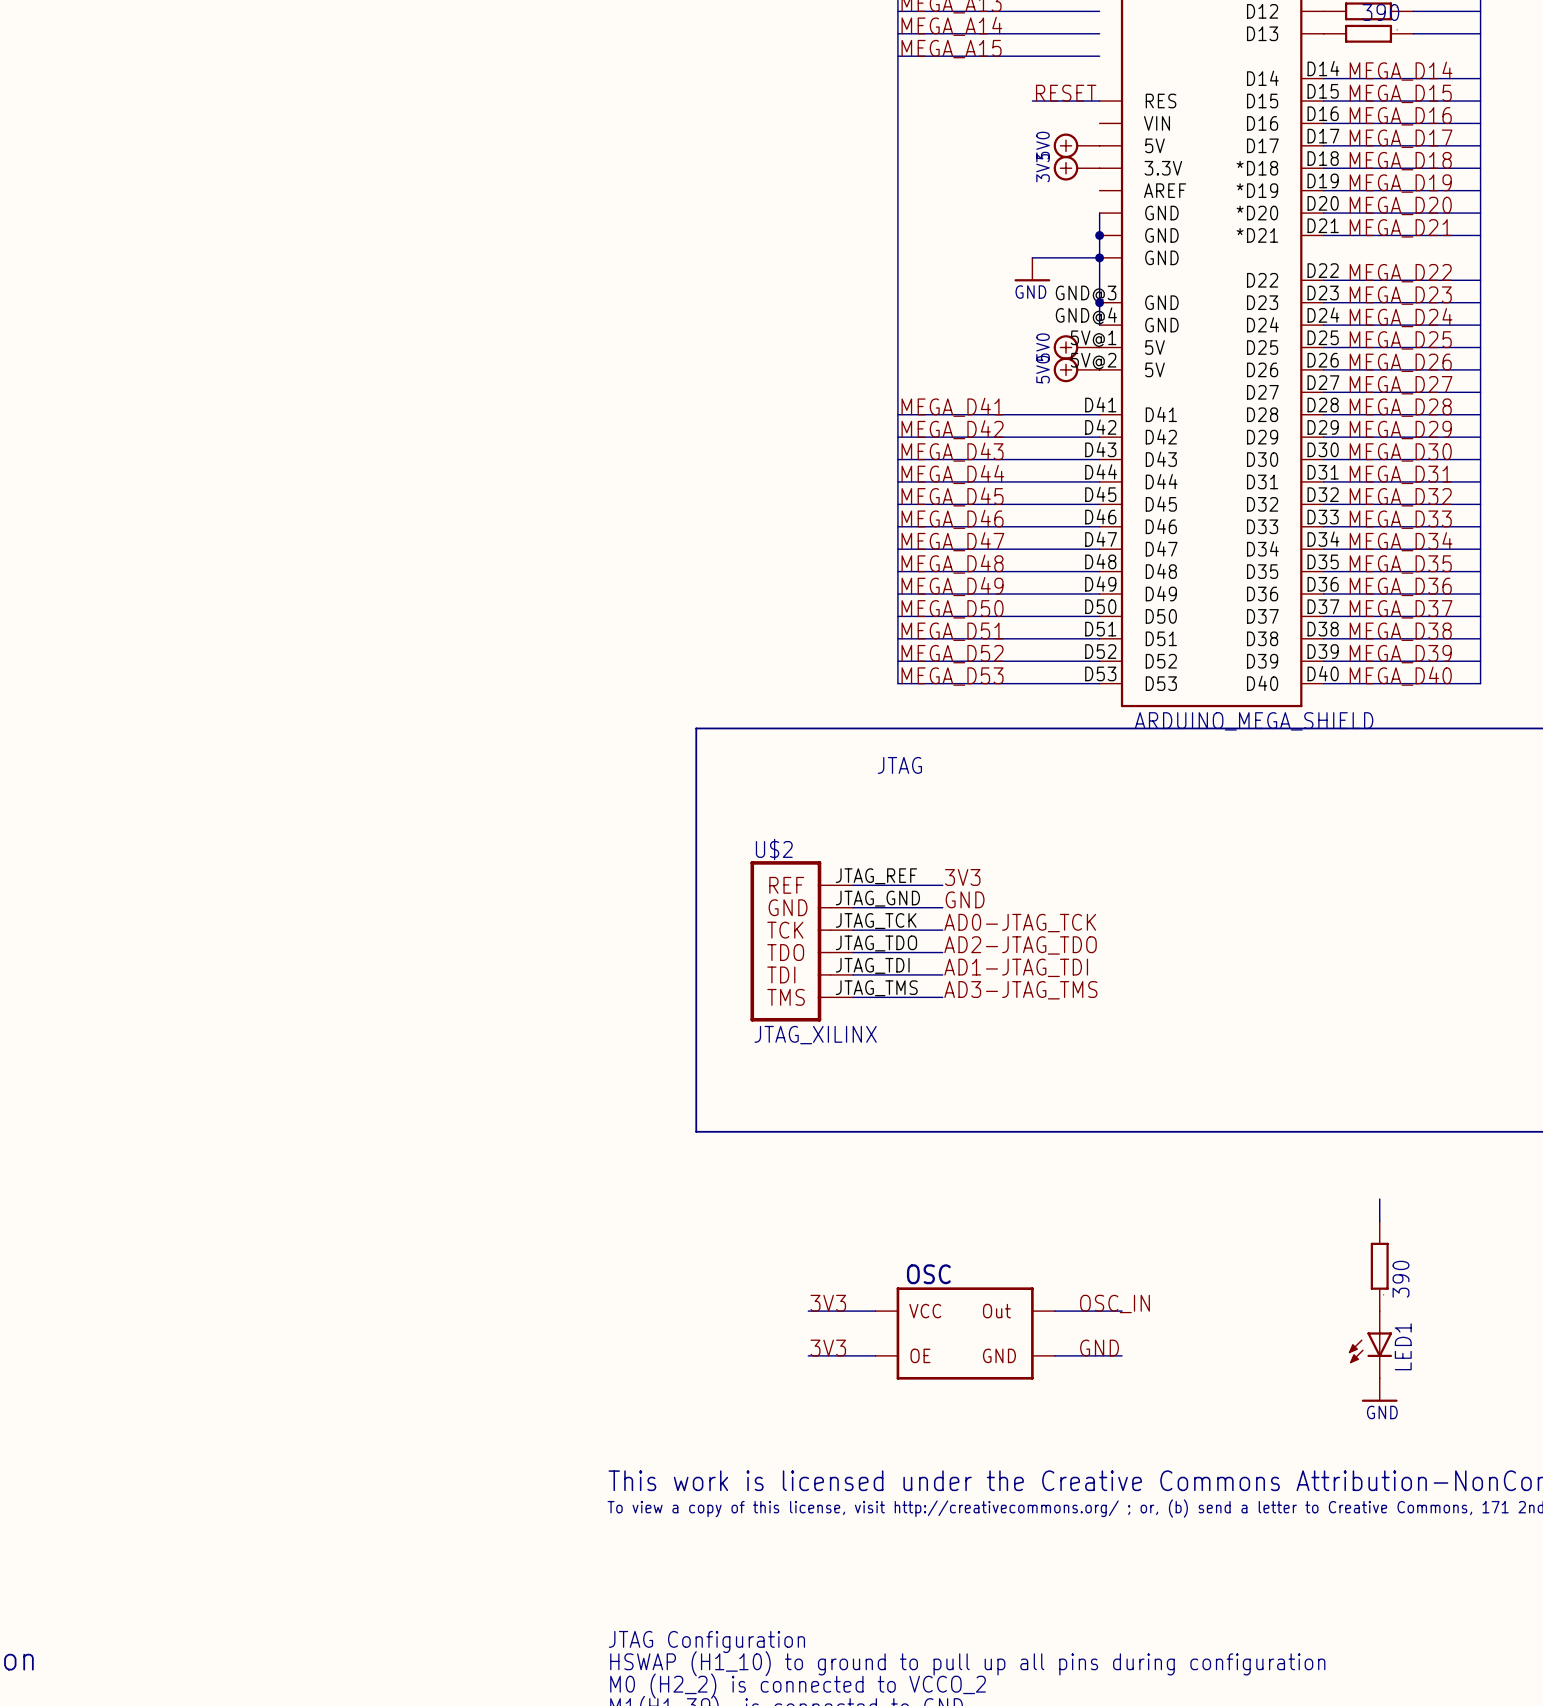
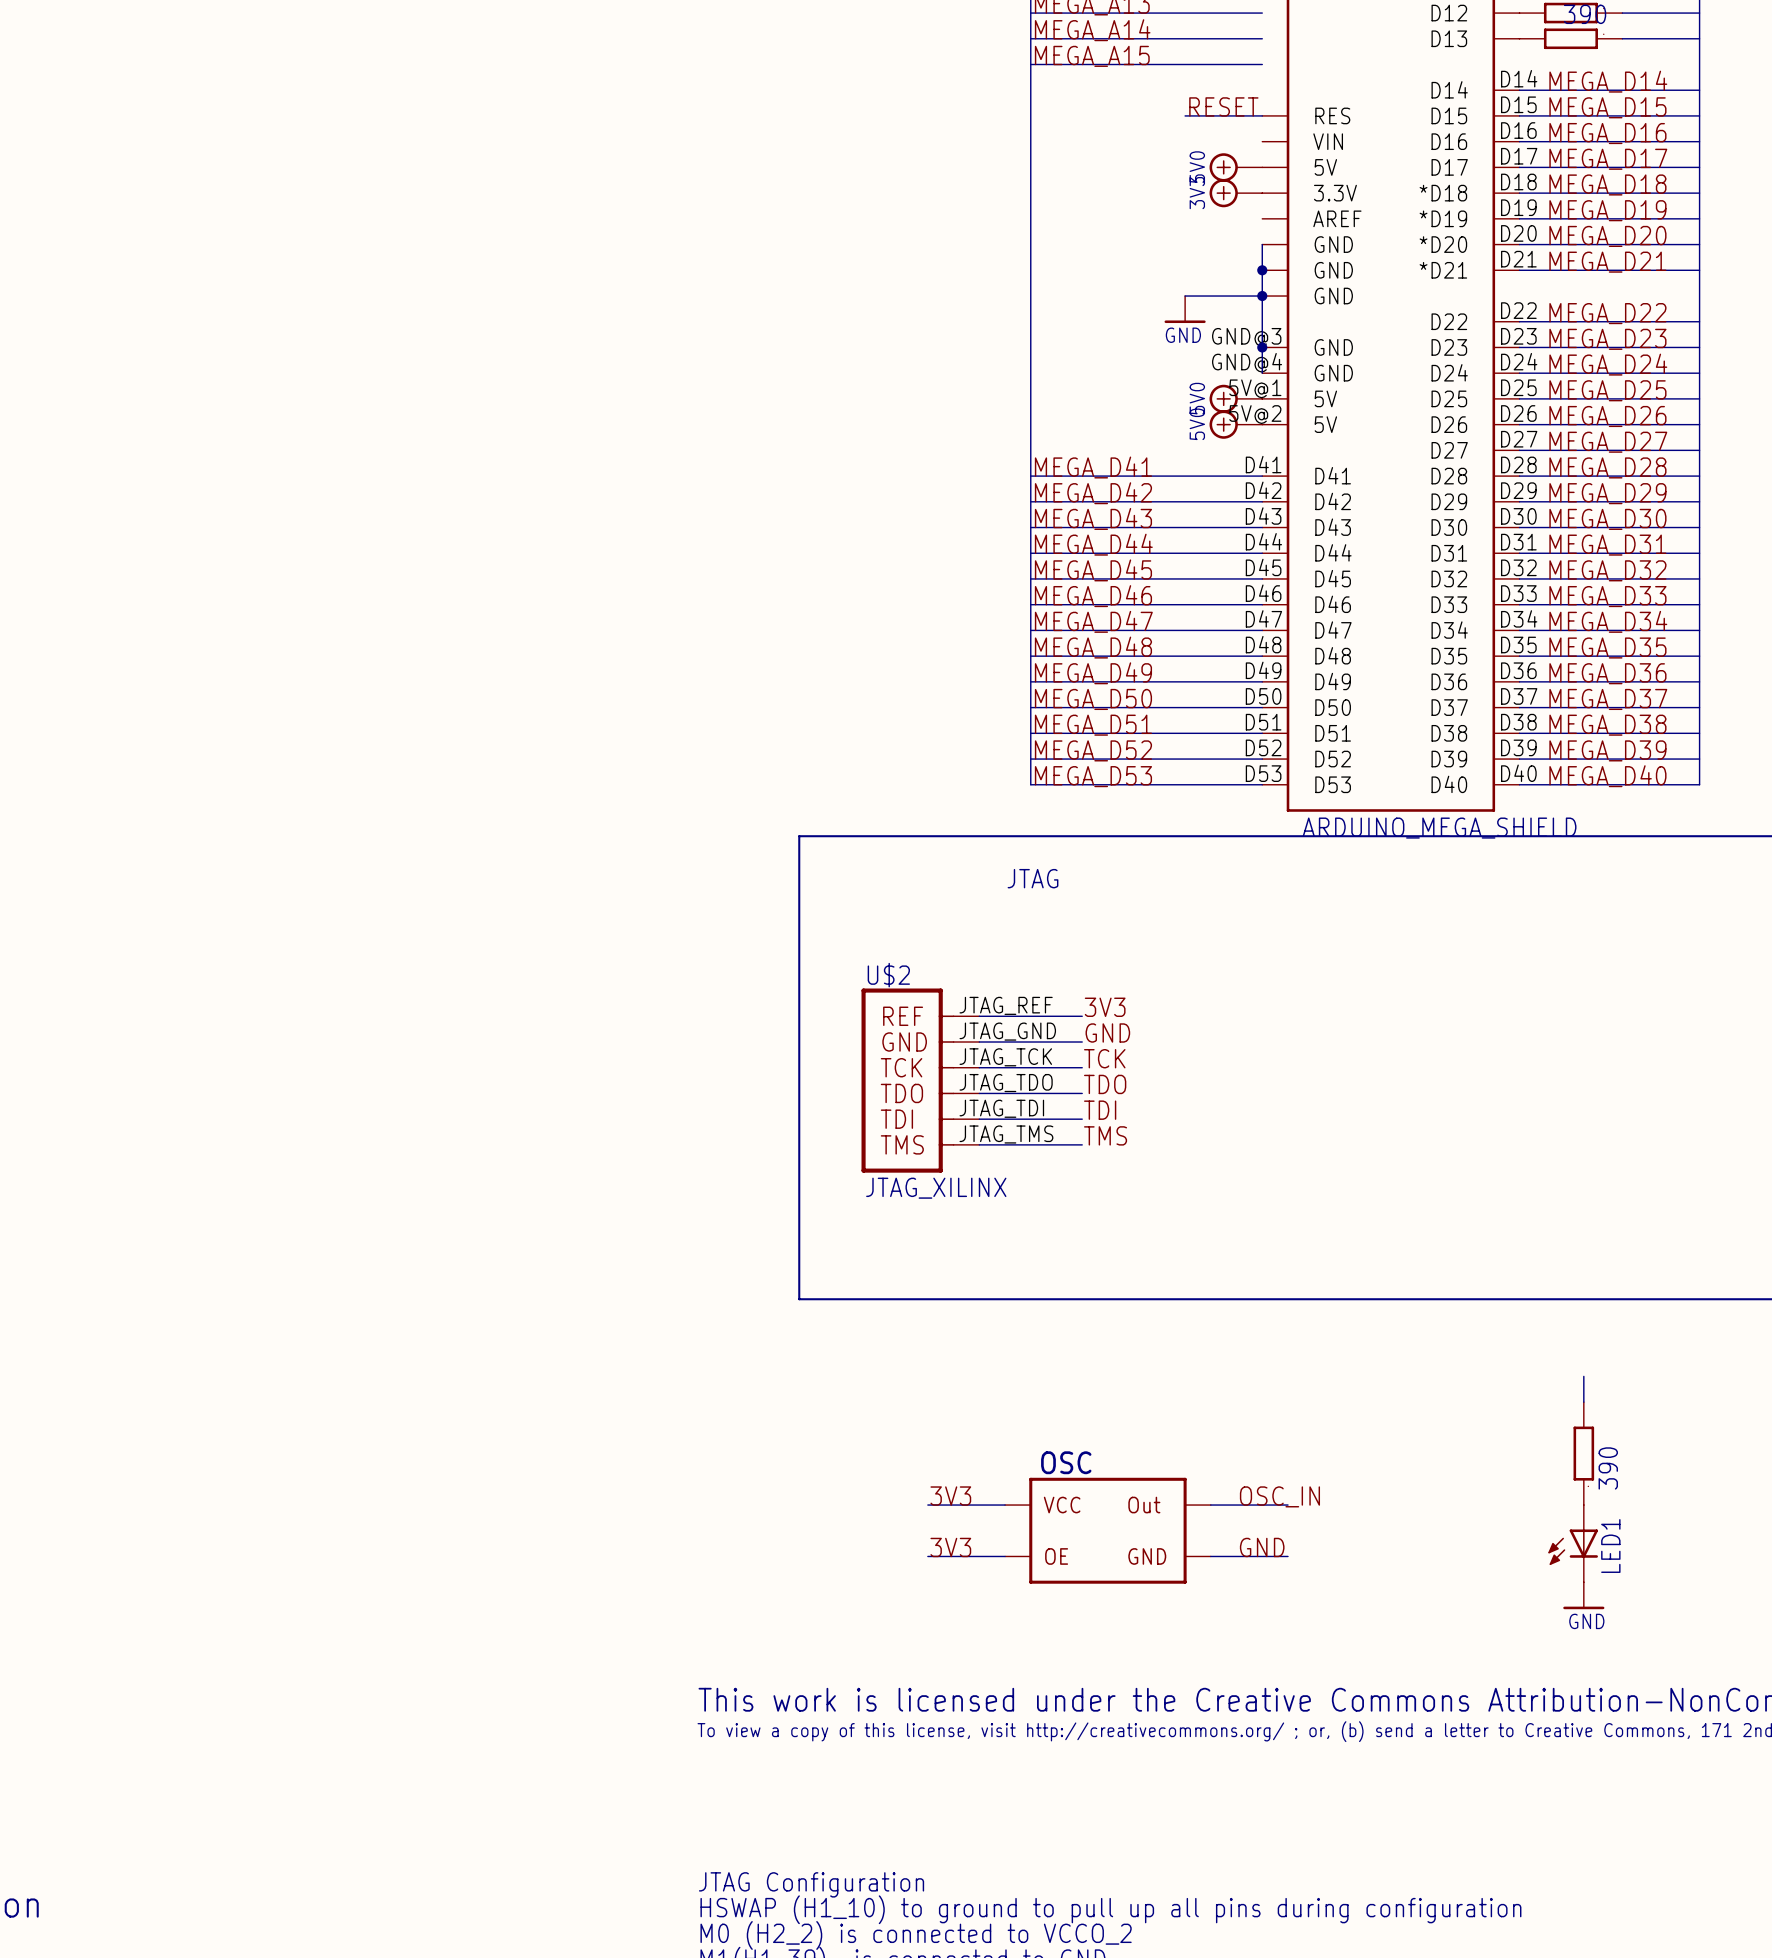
label: AD0-JTAG_TCK (1020, 923) -> TCK (1104, 1058)
label: AD2-JTAG_TDO (1020, 945) -> TDO (1105, 1084)
label: AD1-JTAG_TDI (1016, 967) -> TDI (1100, 1110)
label: AD3-JTAG_TMS (1020, 990) -> TMS (1105, 1135)

